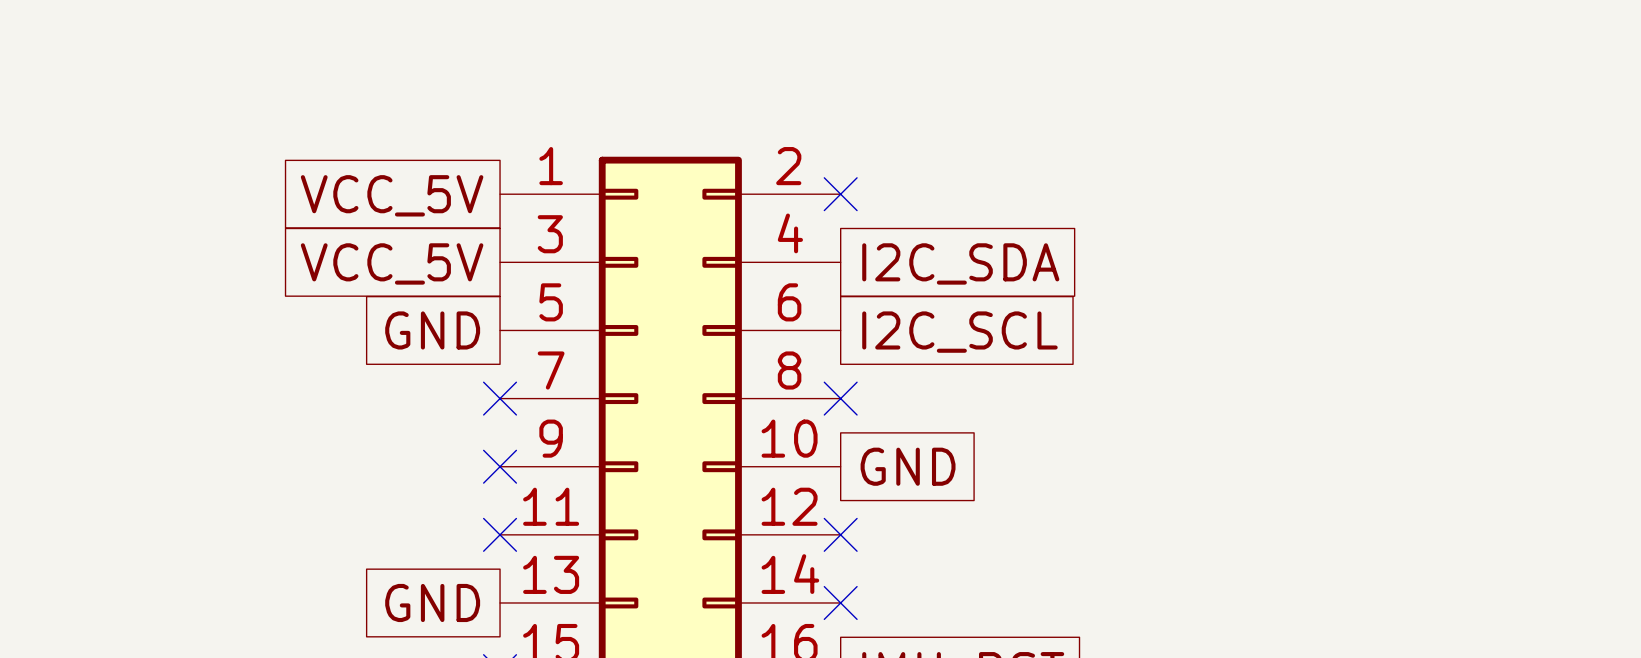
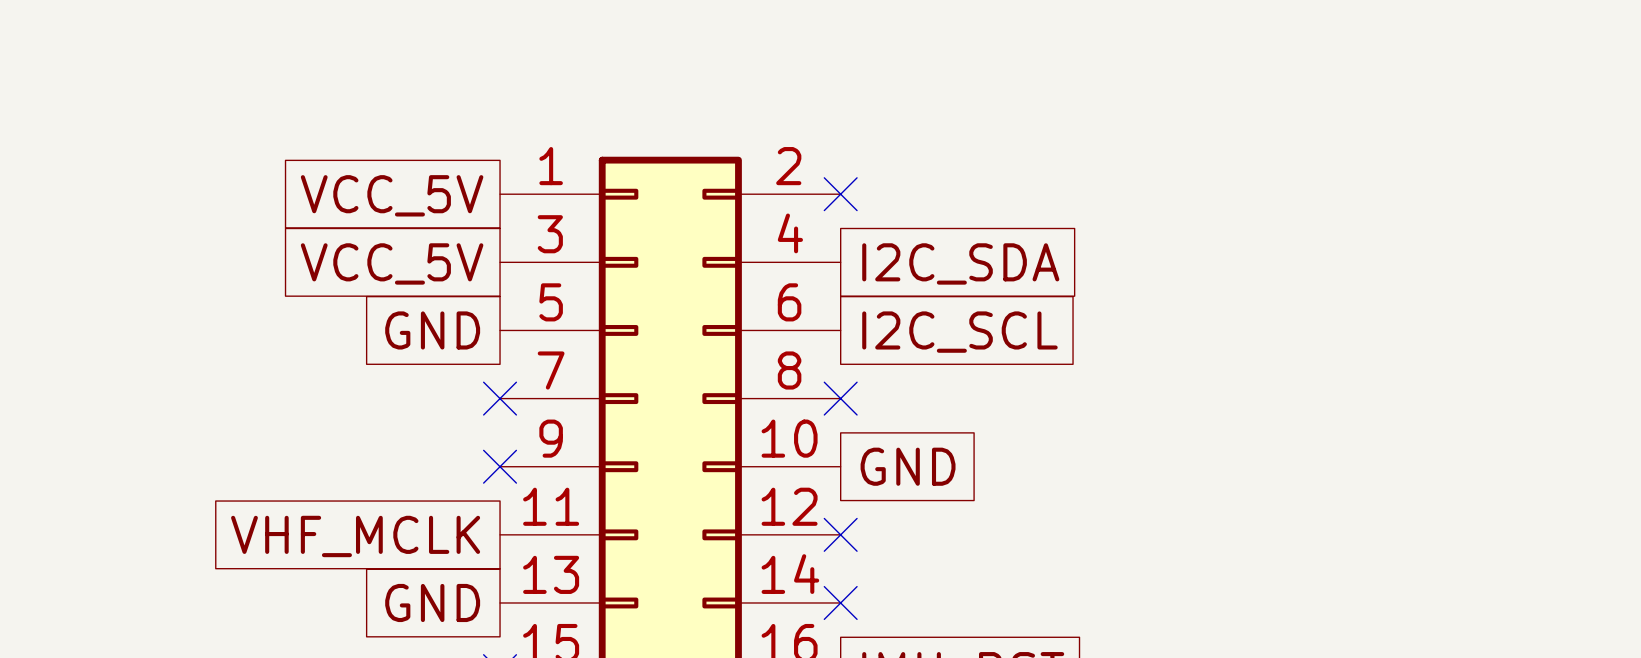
no-connect mark: (500, 534) -> none
global label: none -> VHF_MCLK (355, 536)

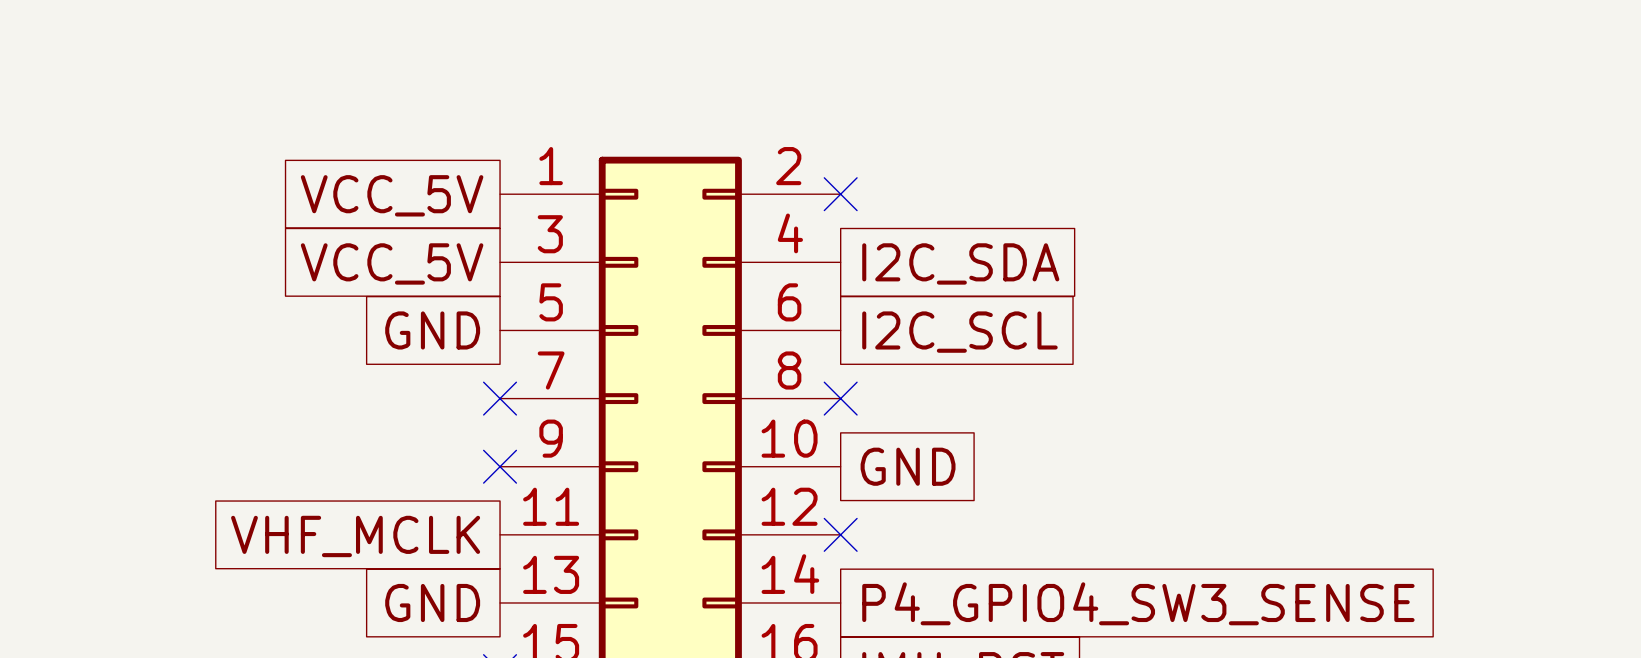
no-connect mark: (840, 602) -> none
global label: none -> P4_GPIO4_SW3_SENSE (1138, 603)

